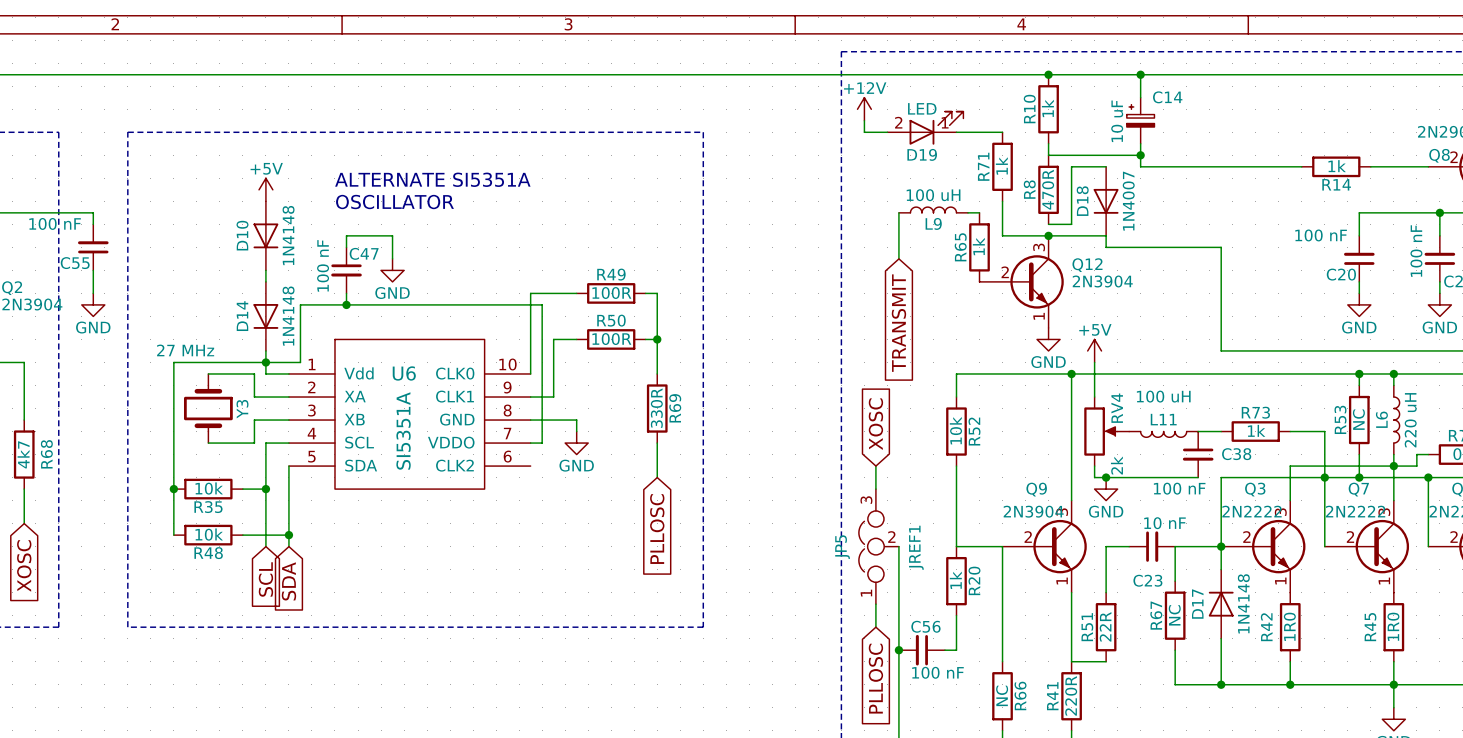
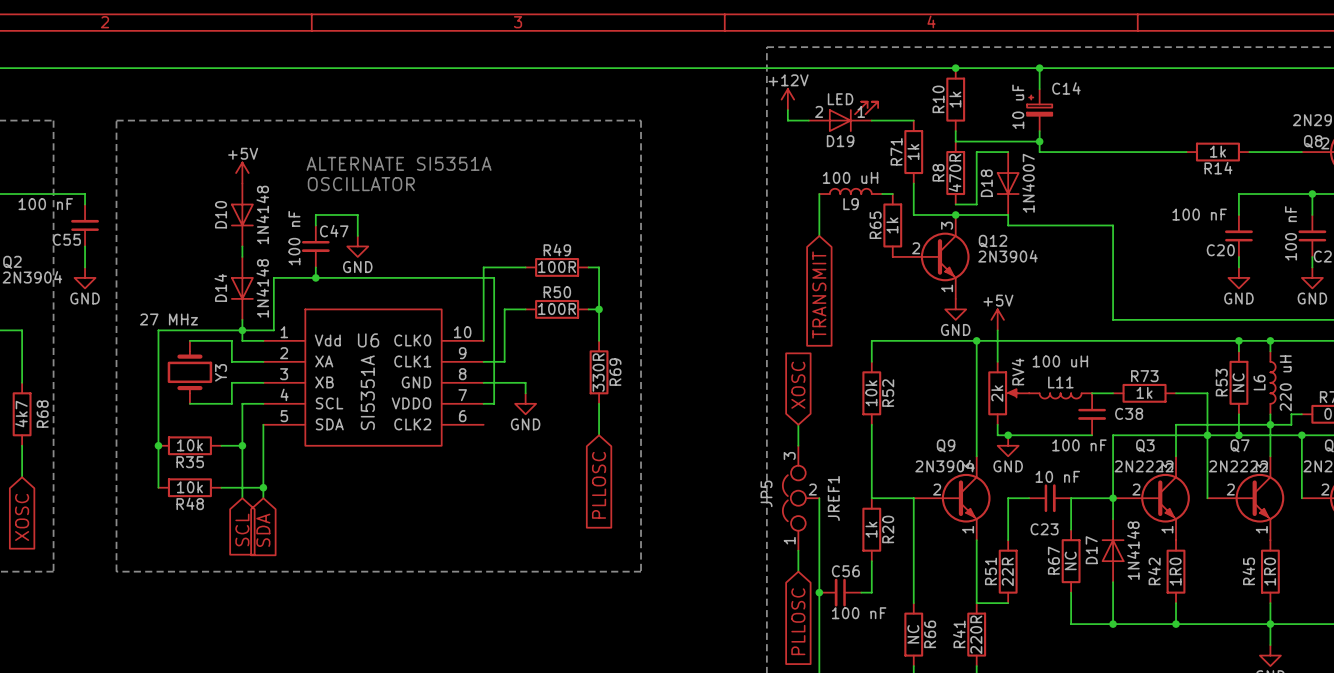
RV4 value position: 2k (1116, 465) -> 2k (997, 393)

